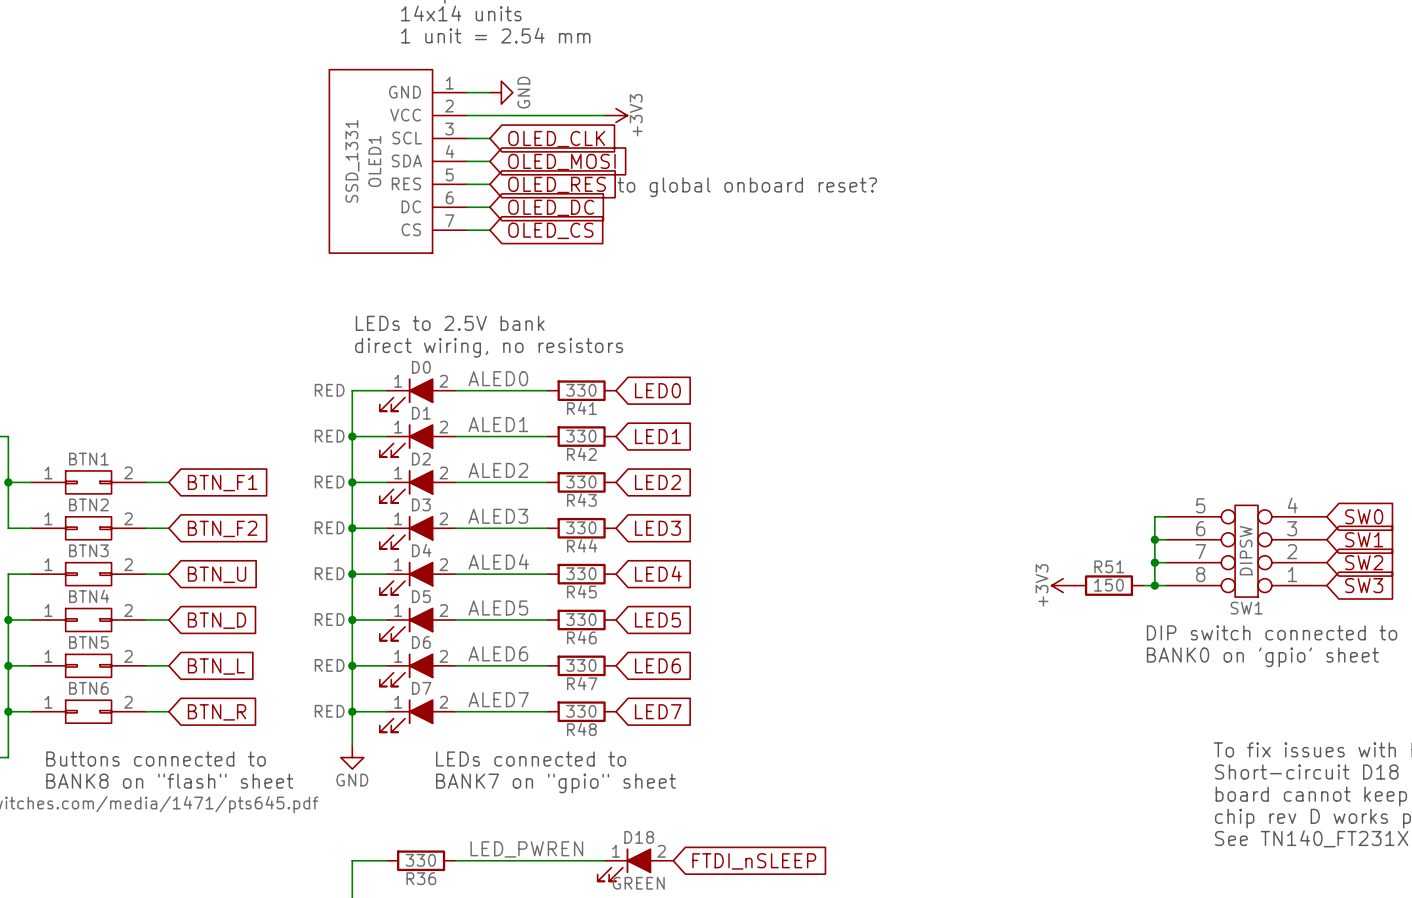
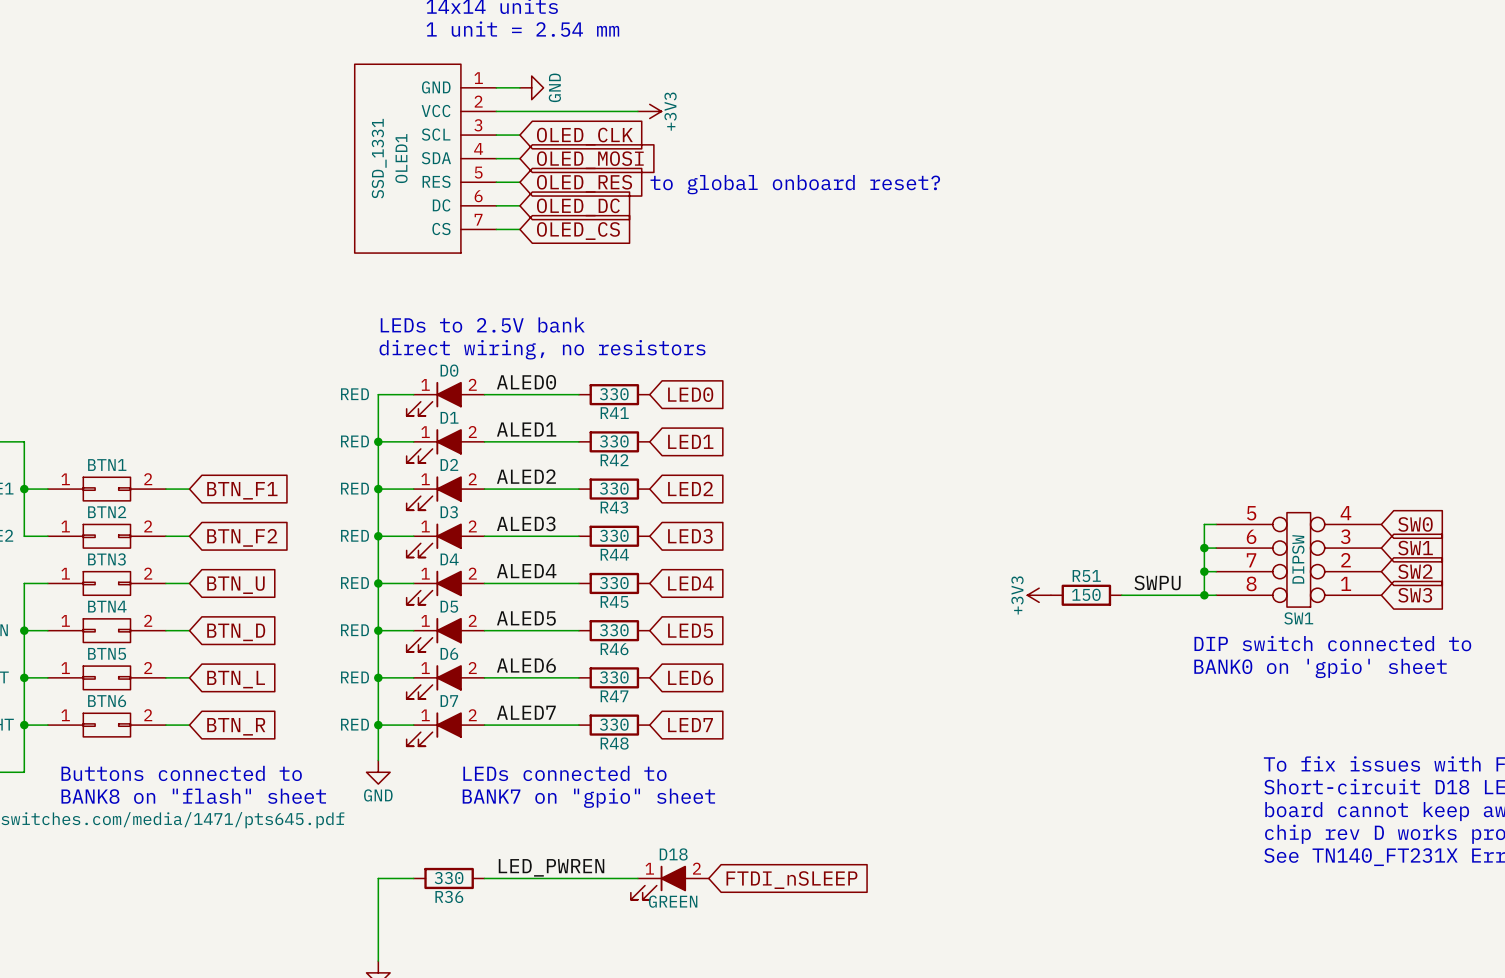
label: none -> SWPU (1157, 582)
power symbol position: +3V3 (1063, 585) -> +3V3 (1039, 595)
wire: none -> (1121, 595) (1192, 595)
R51 position: (1108, 585) -> (1086, 595)

